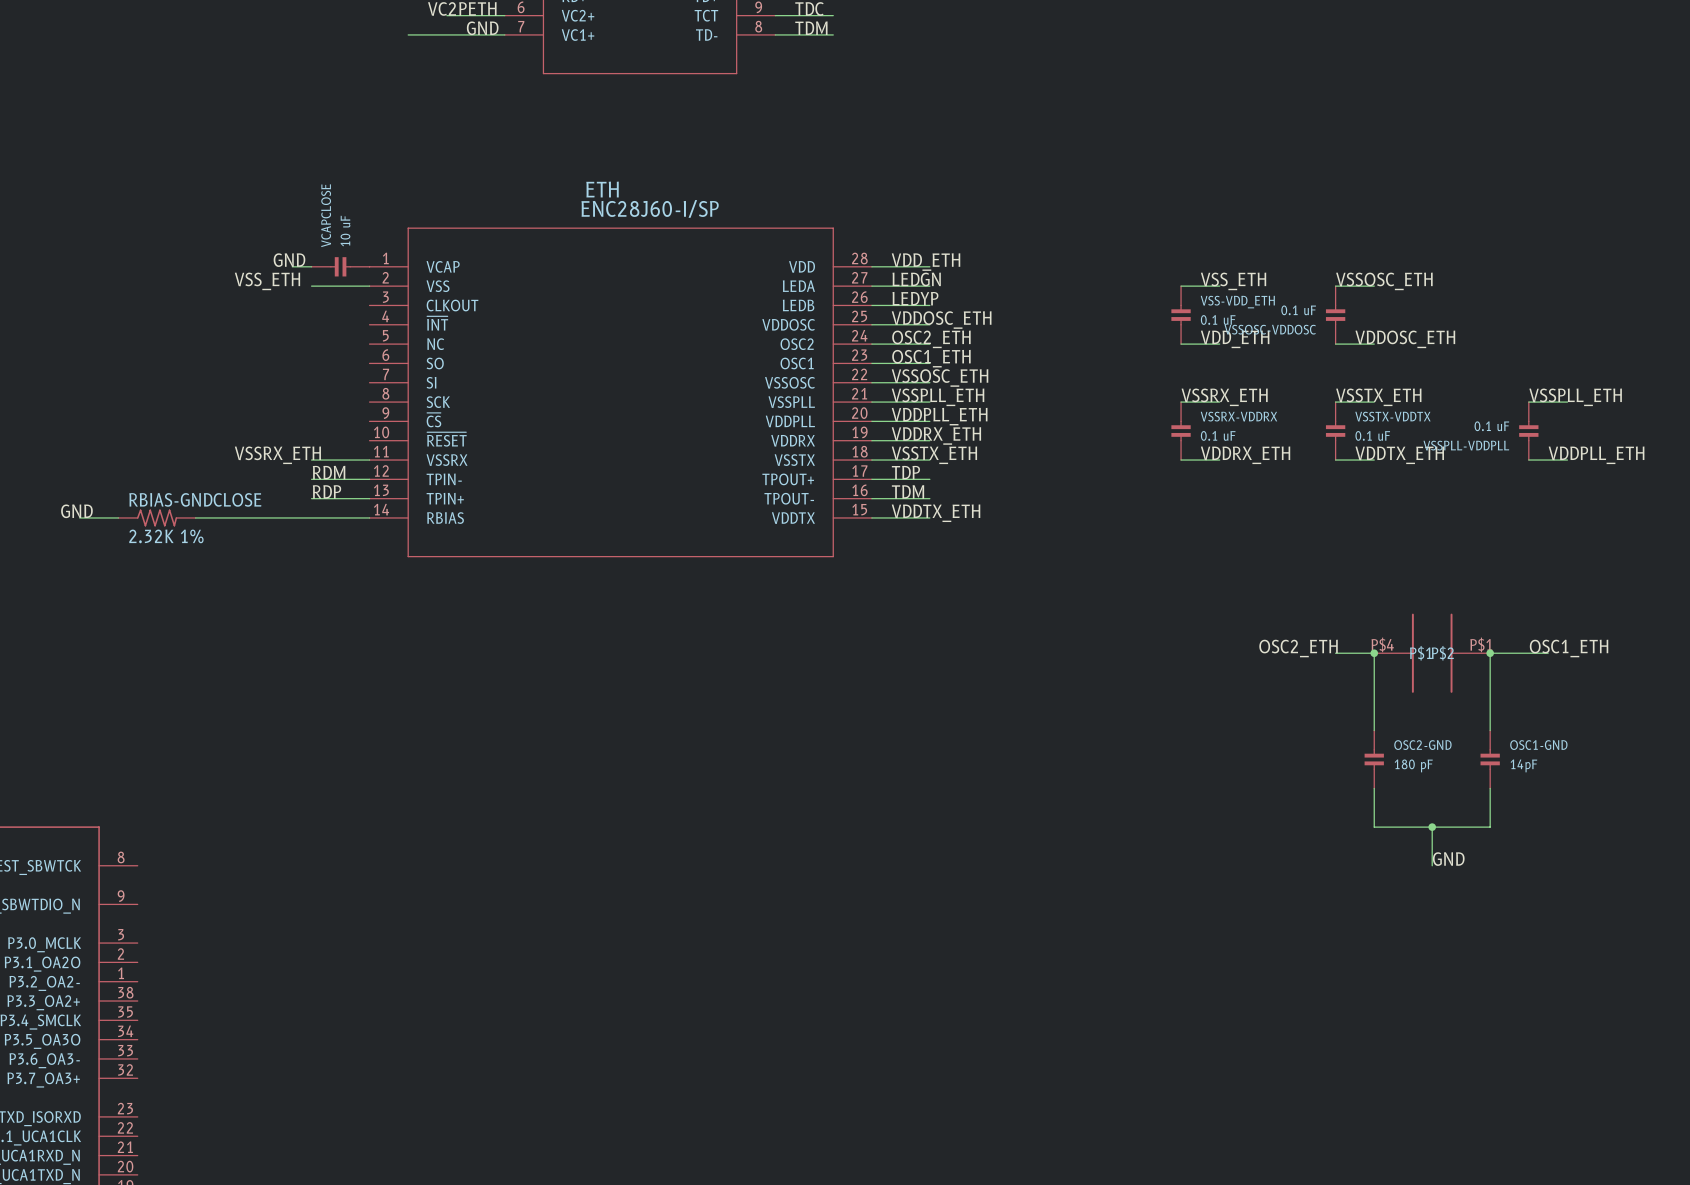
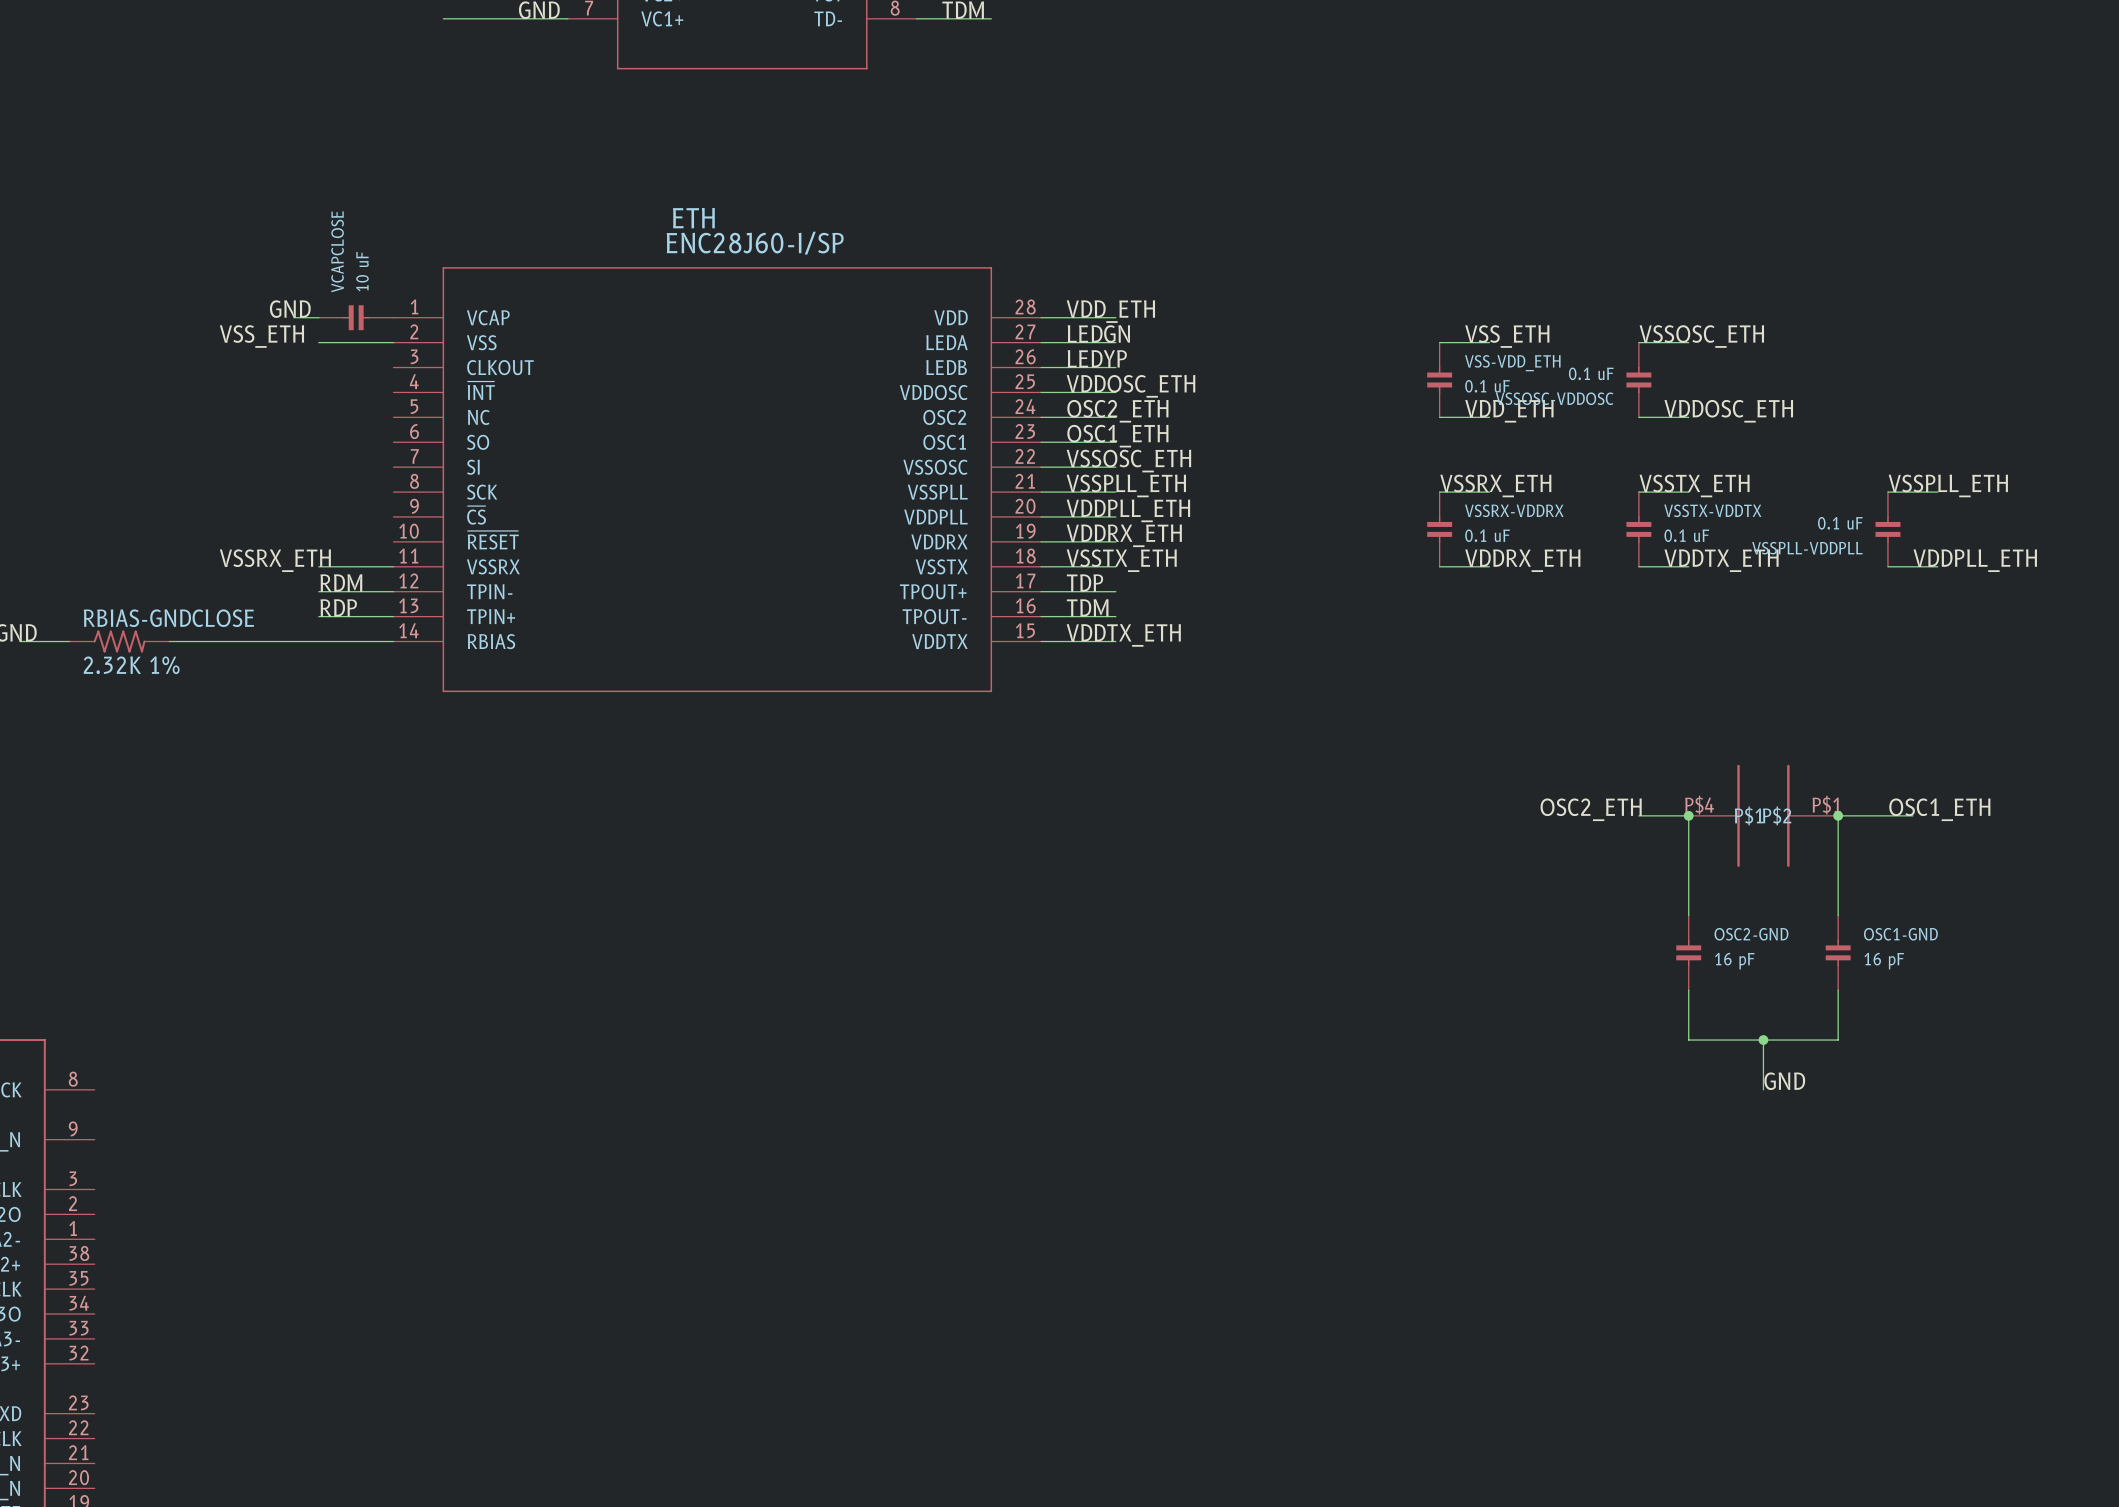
OSC2-GND value: 180 pF (1413, 765) -> 16 pF (1734, 961)
OSC1-GND value: 14pF (1523, 765) -> 16 pF (1884, 961)

